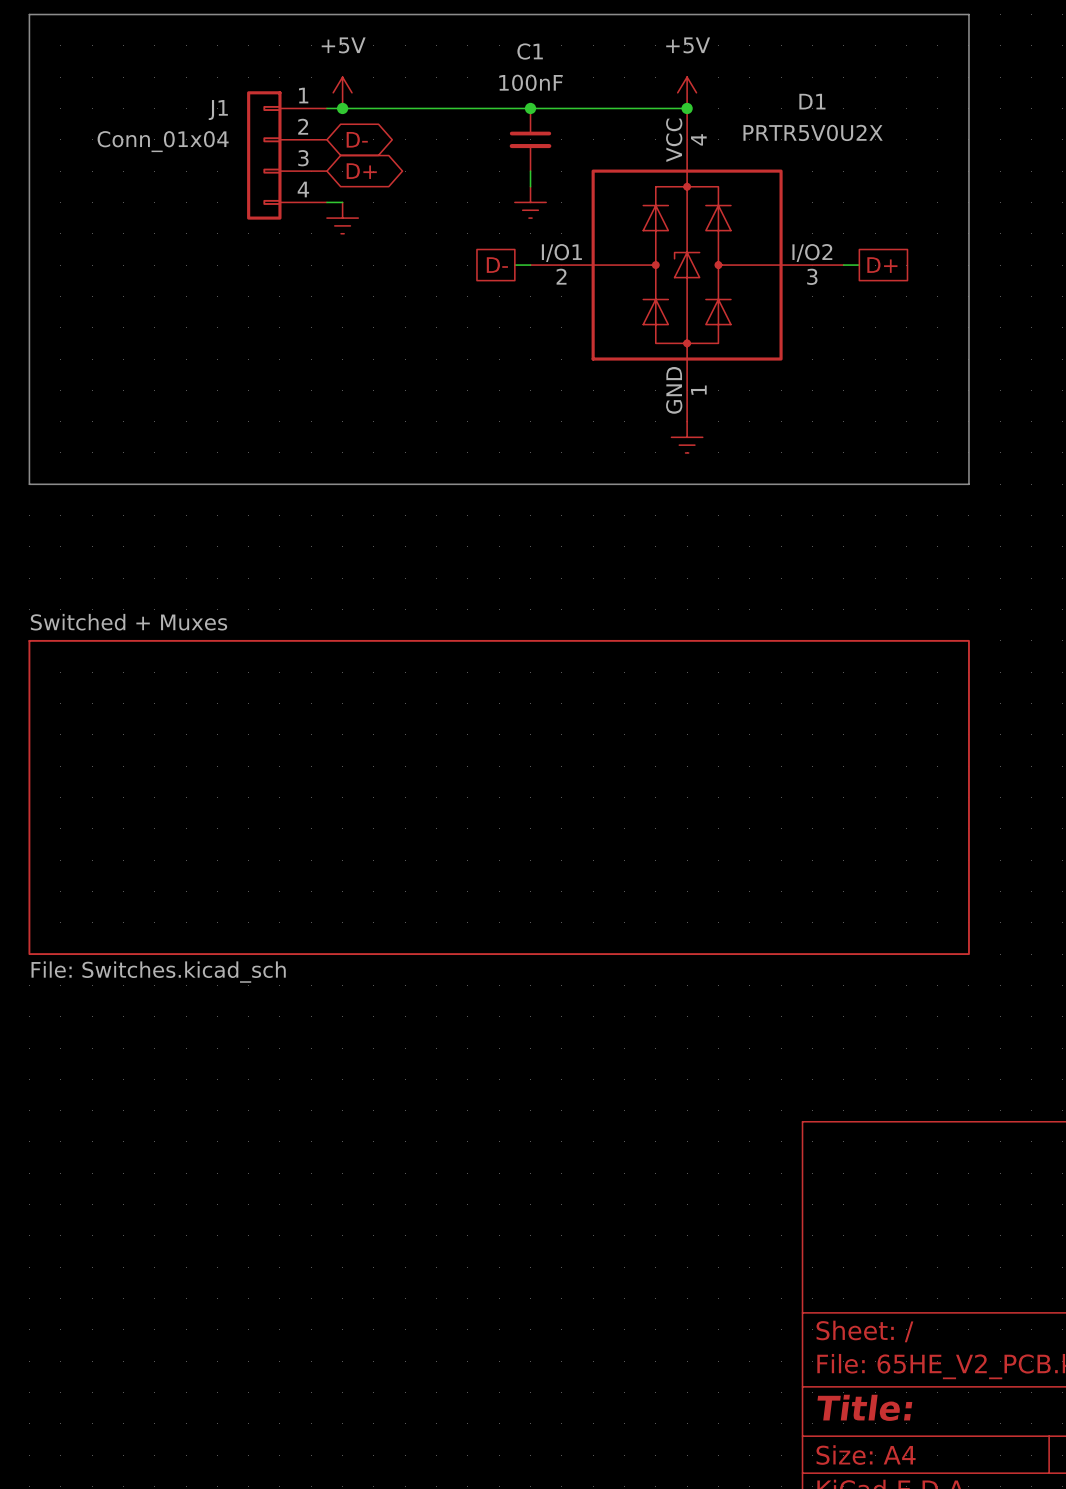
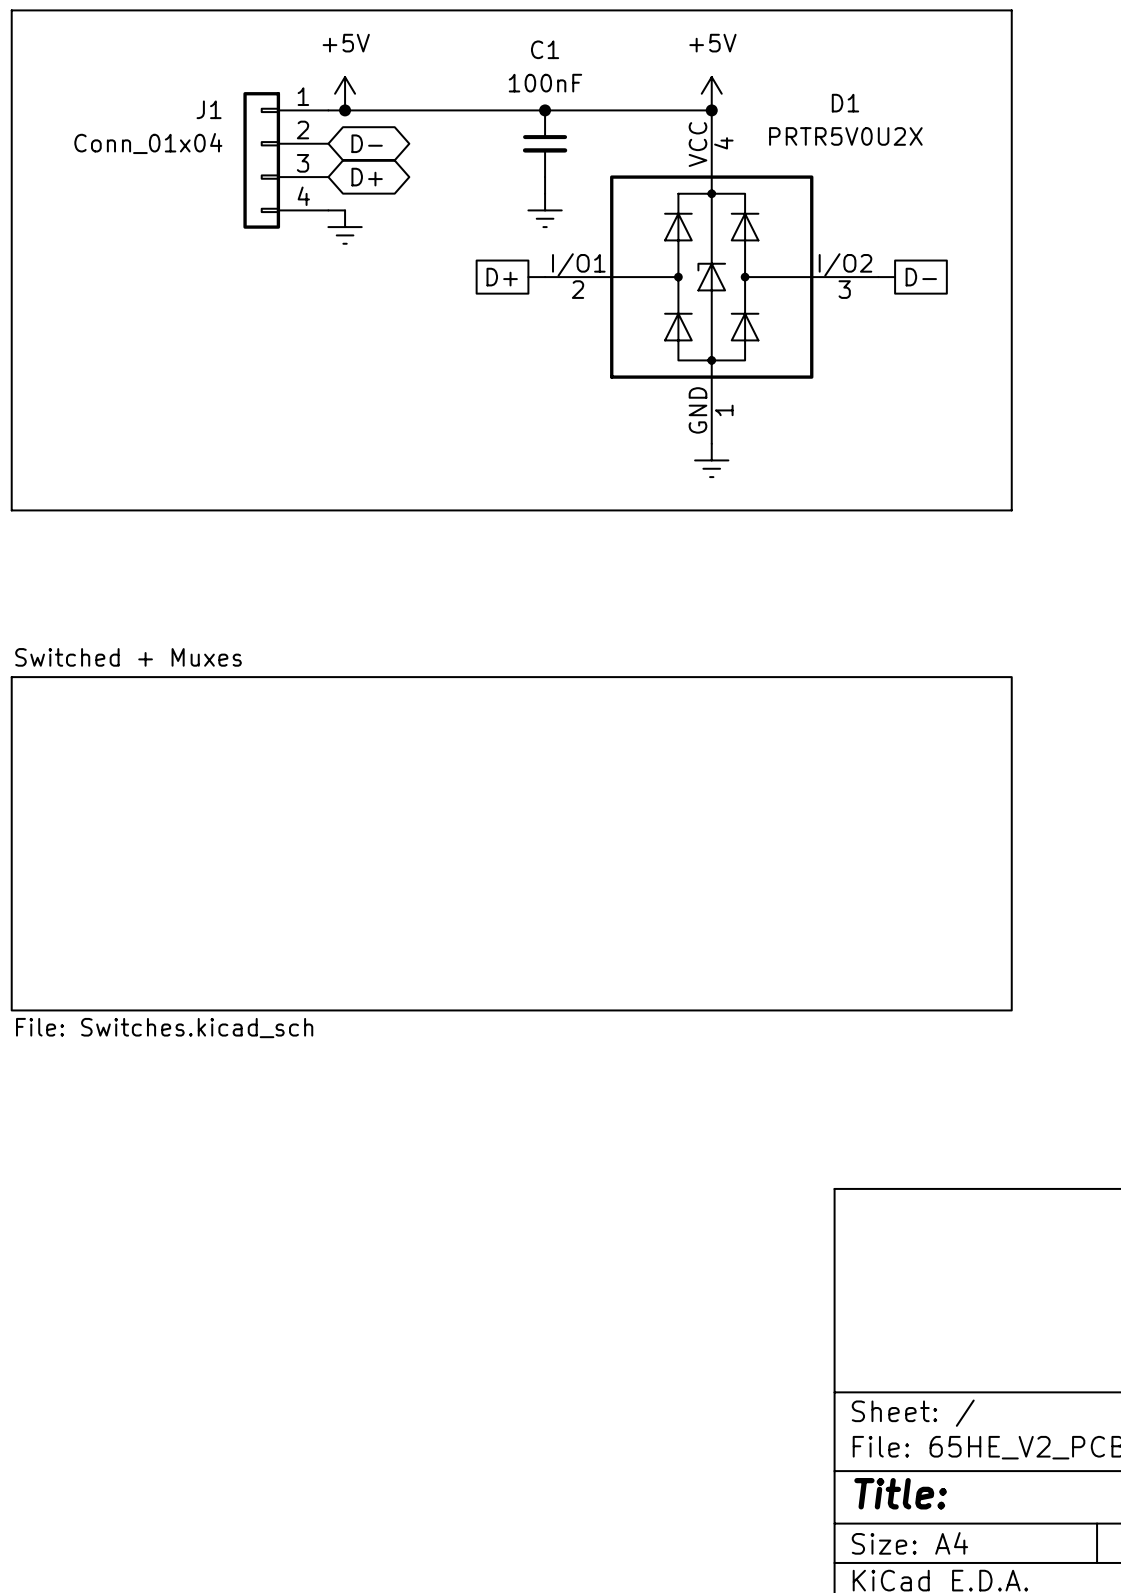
global label: D- (497, 265) -> D+ (502, 277)
global label: D+ (882, 265) -> D- (921, 277)

